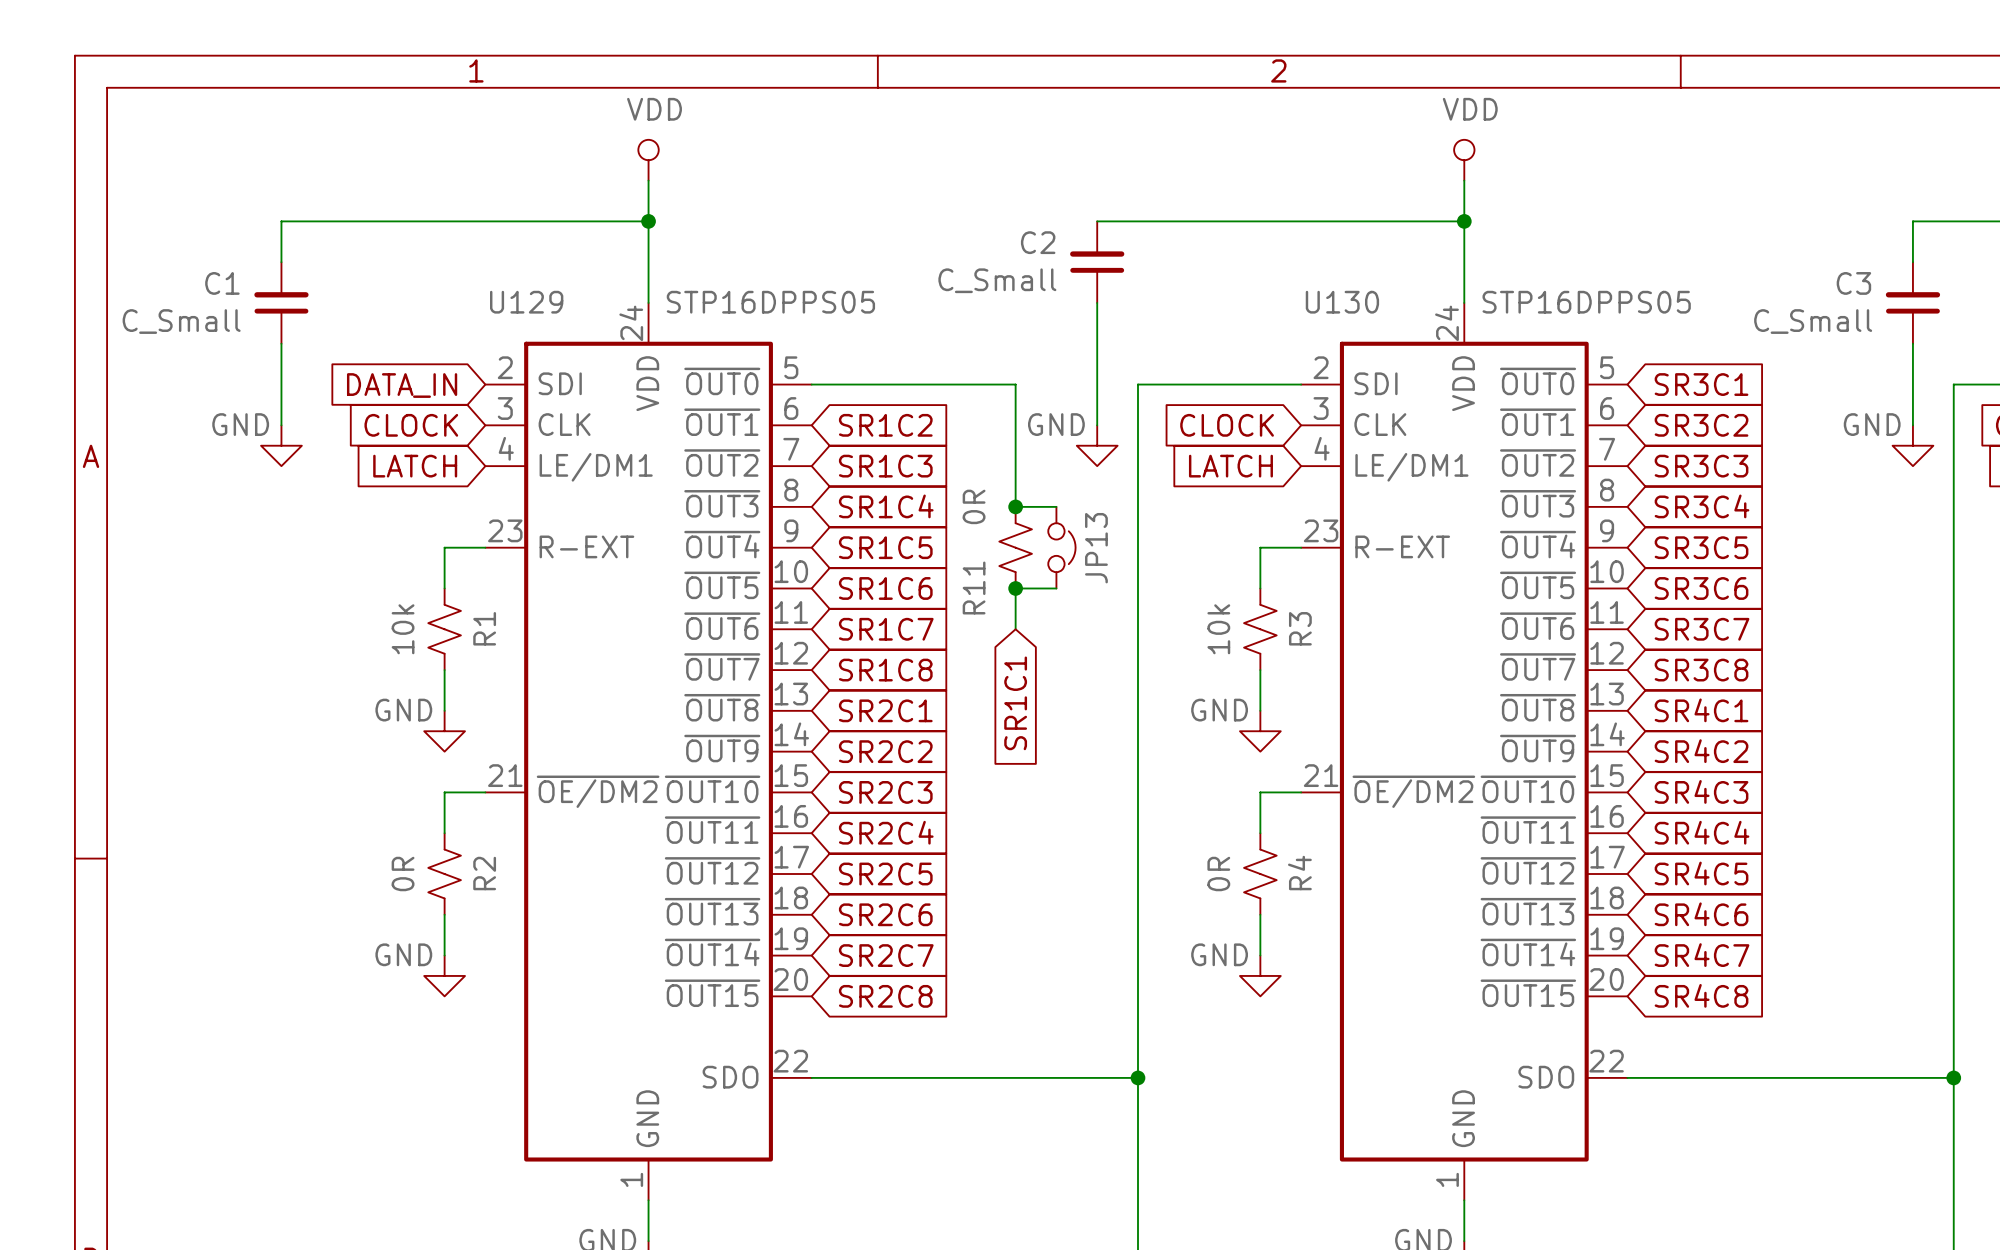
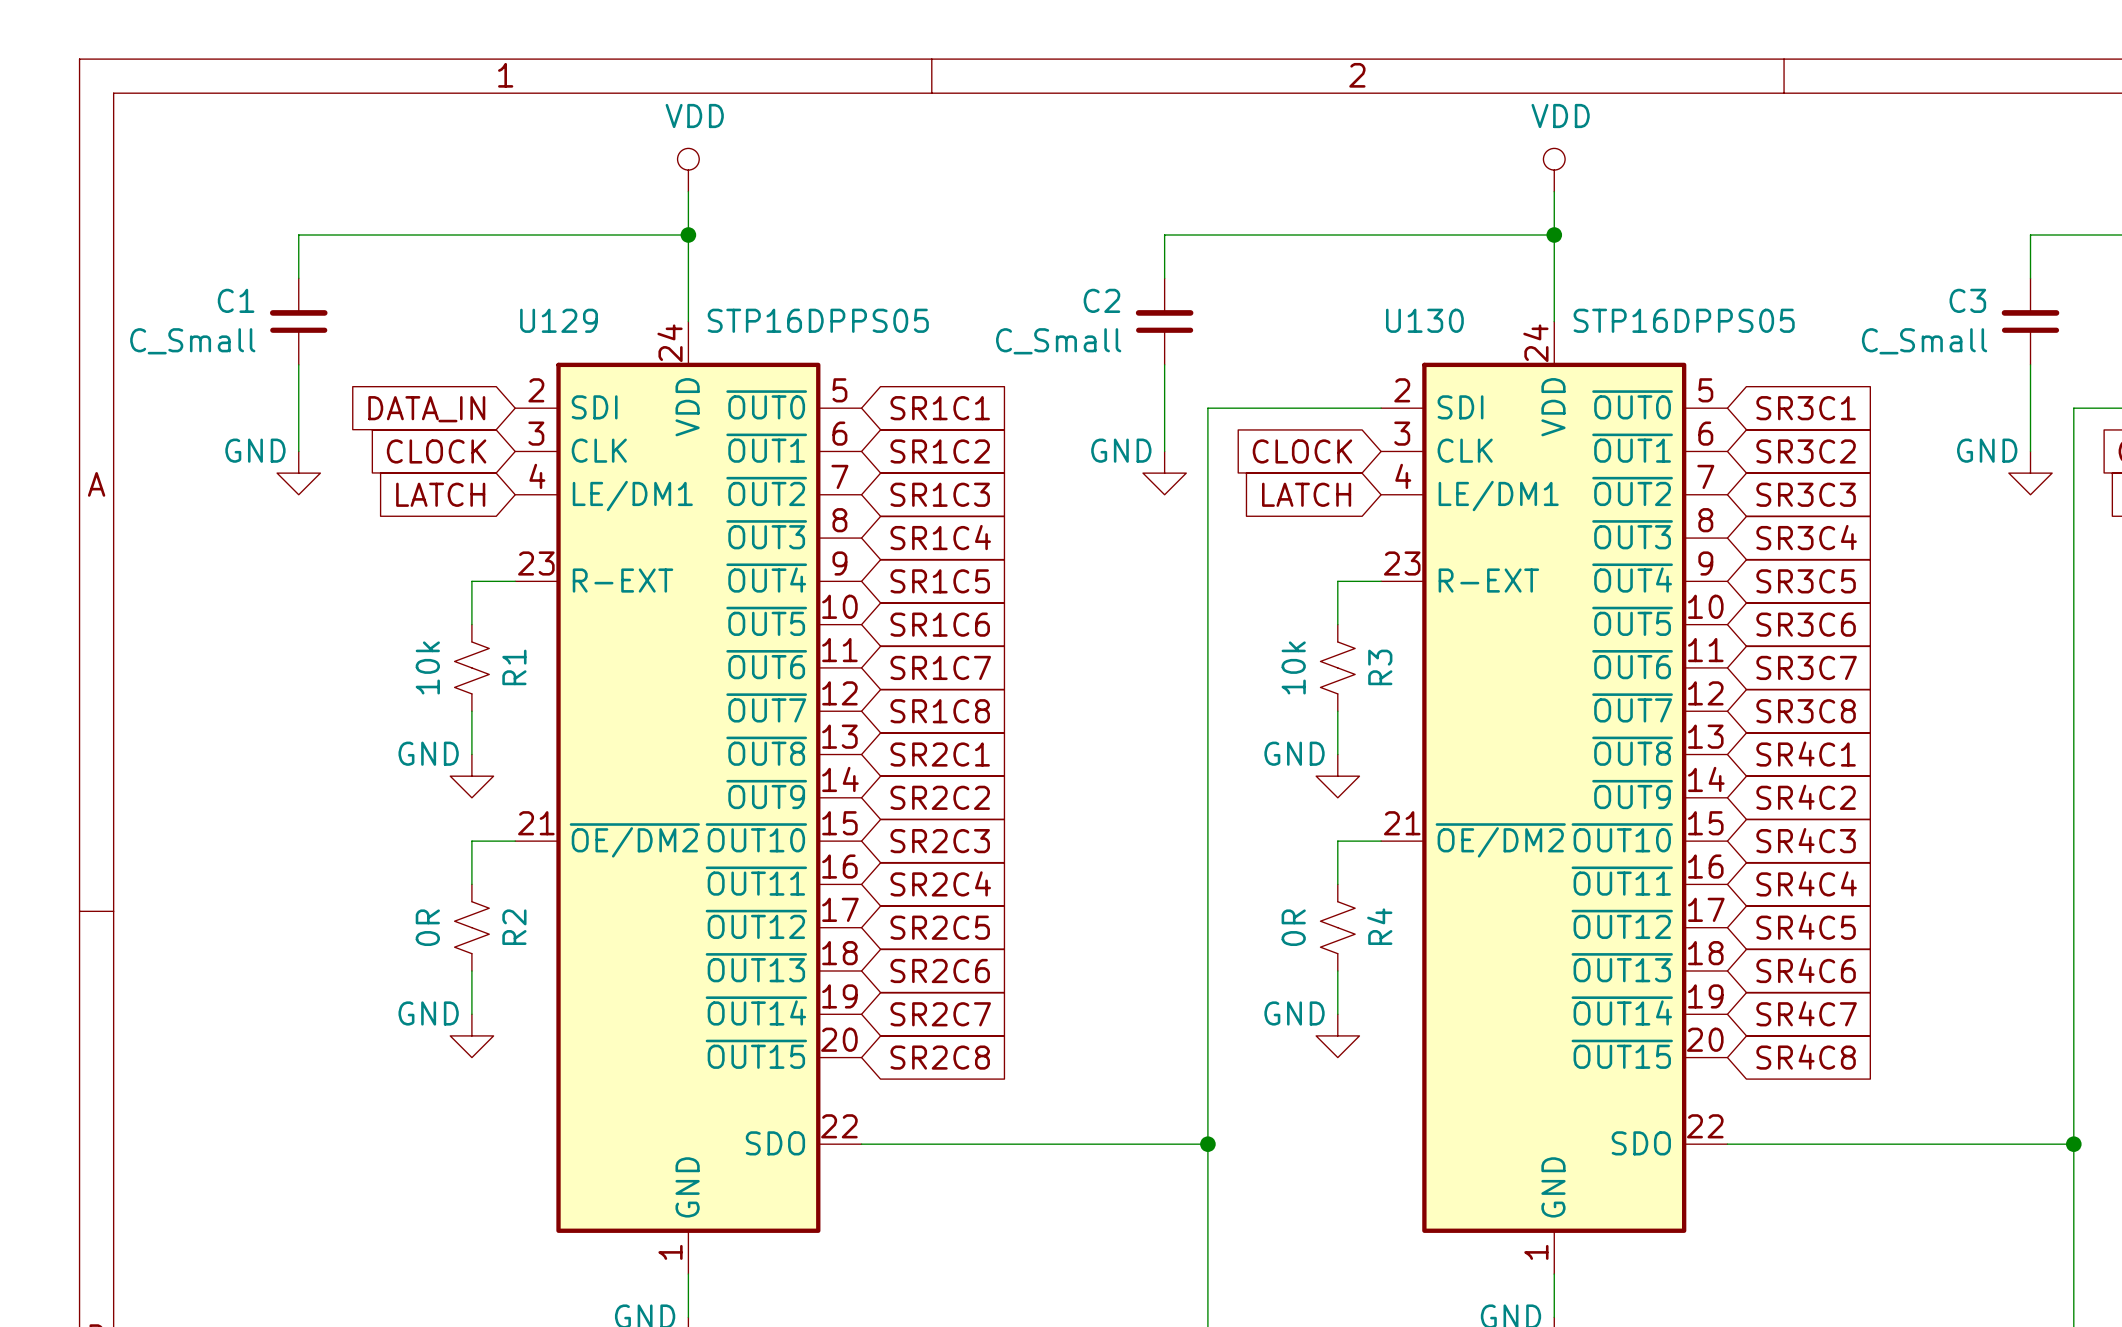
C2 position: (1097, 262) -> (1164, 321)
wire: (811, 384) (1015, 384) (1015, 506) (1056, 506) -> none
junction: (1015, 506) -> none
R11: 0R (1015, 547) -> none
JP13: (1061, 547) -> none
junction: (1015, 588) -> none
wire: (1056, 588) (1015, 588) (1015, 629) -> none
global label rotation: 0° (1015, 703) -> 90° counterclockwise (940, 408)
global label position: SR1C1 (1015, 703) -> SR1C1 (940, 408)

